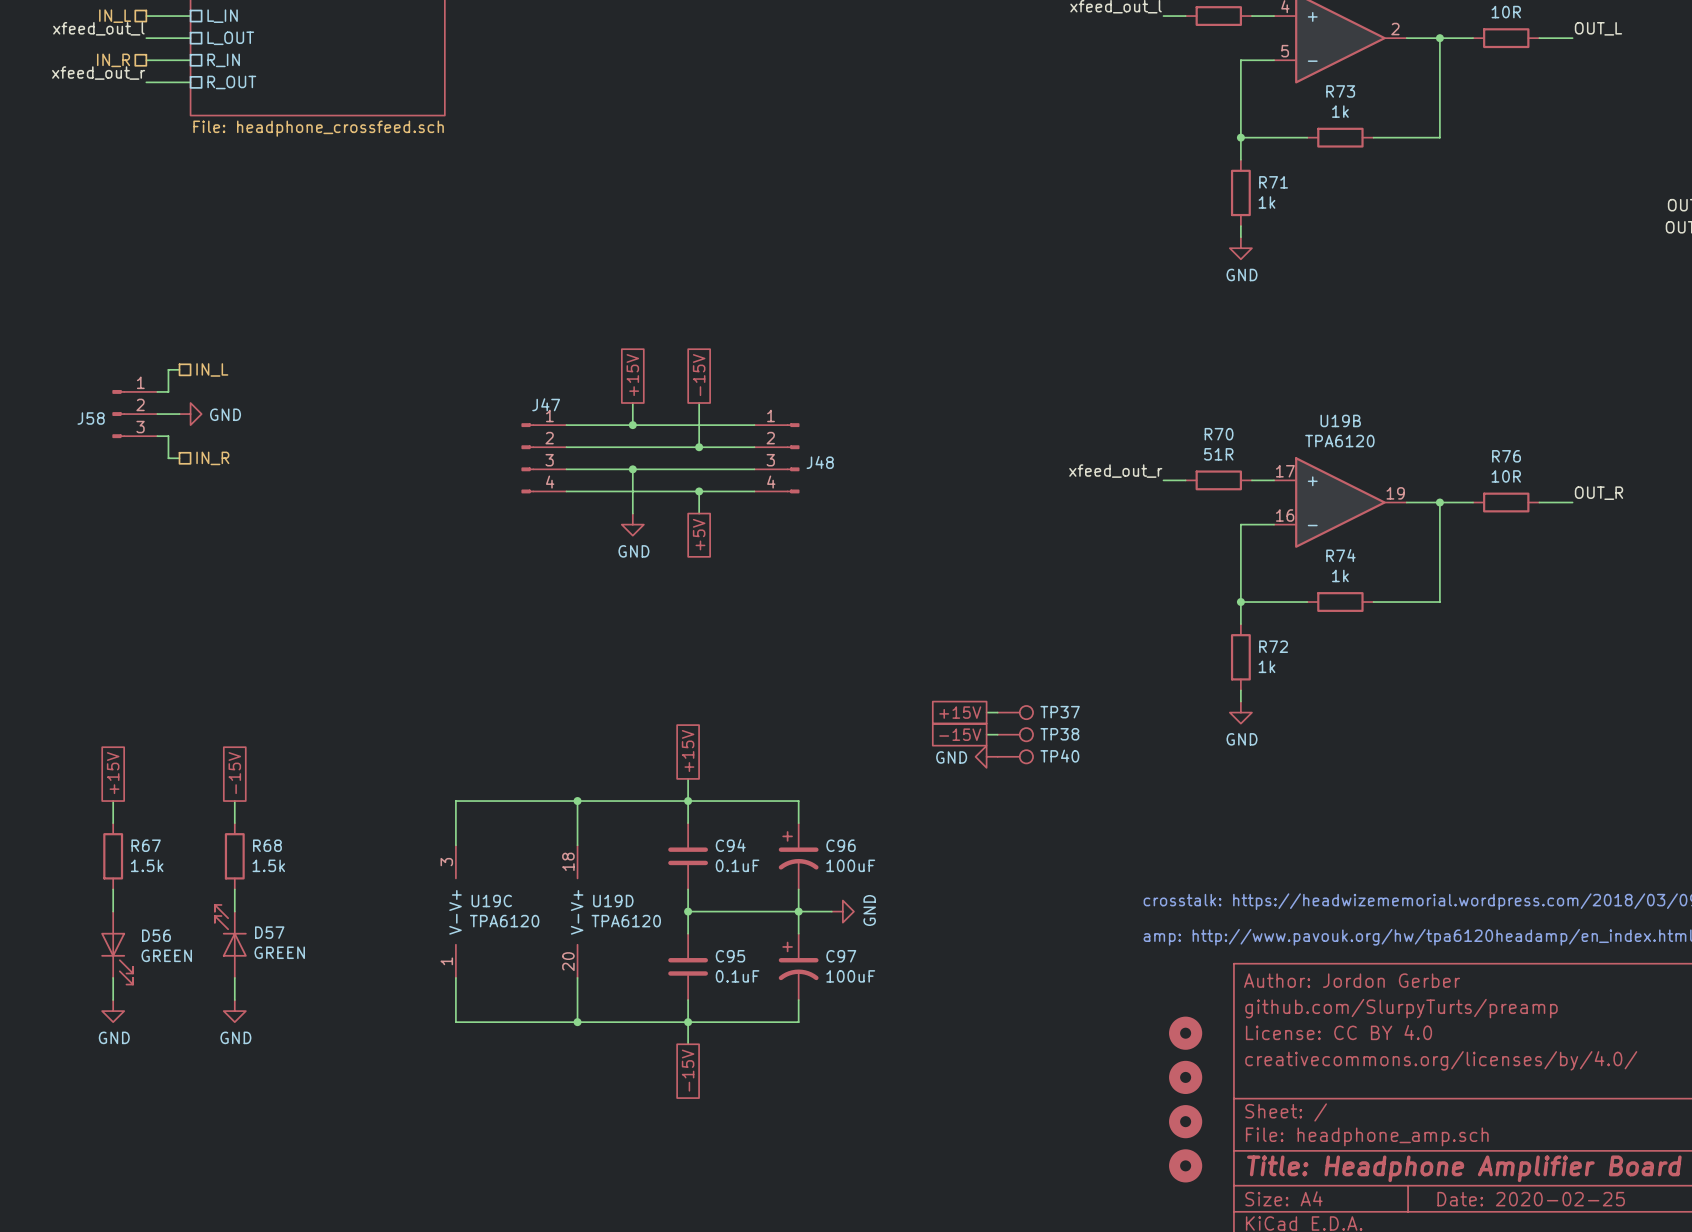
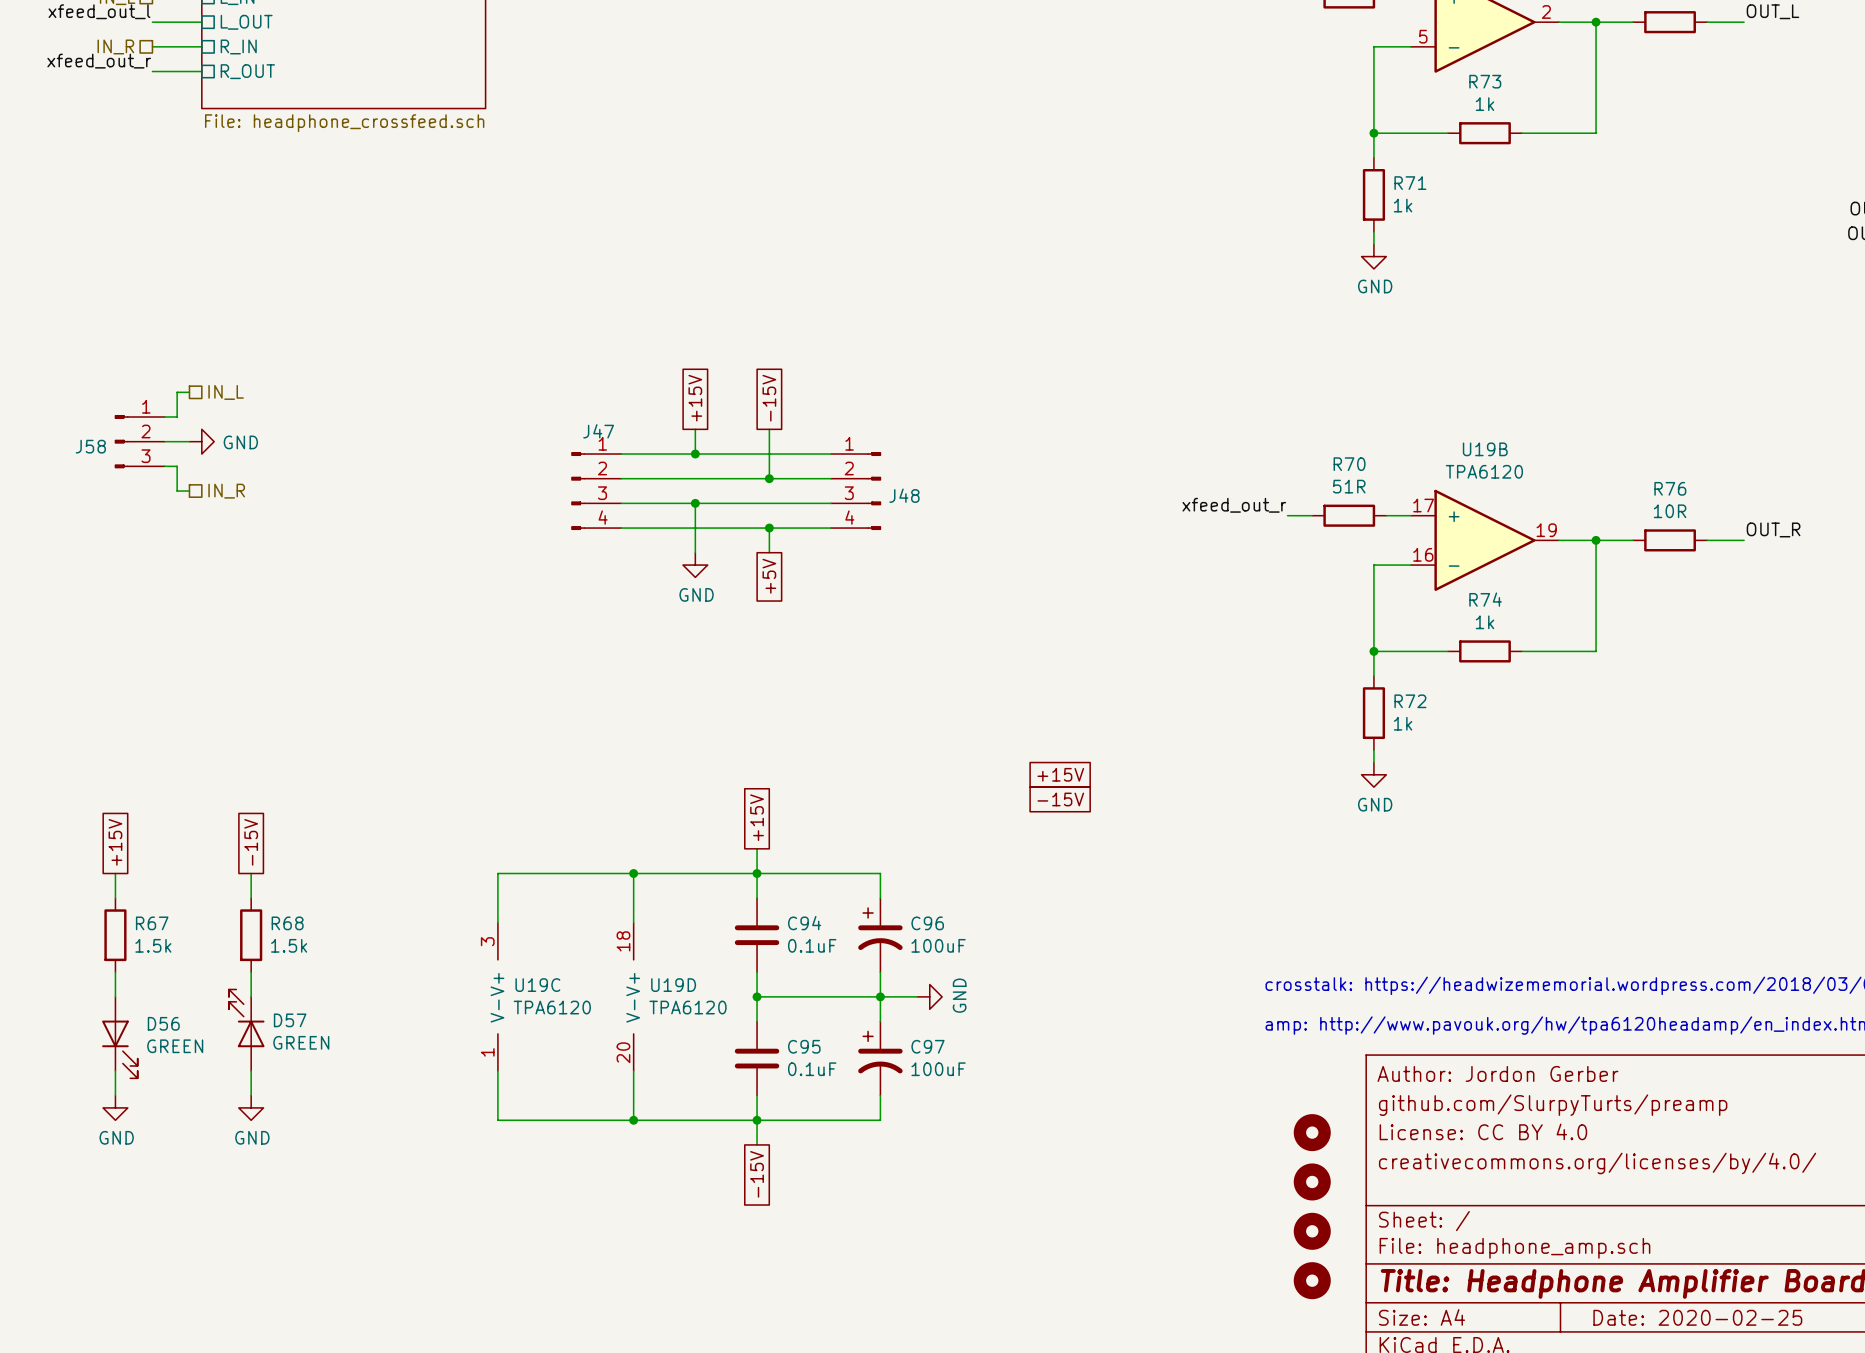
wire: (986, 712) (997, 712) -> none
TP37: (1015, 712) -> none
wire: (986, 734) (997, 734) -> none
TP38: (1015, 734) -> none
power symbol: GND (986, 756) -> none
TP40: (1015, 756) -> none

